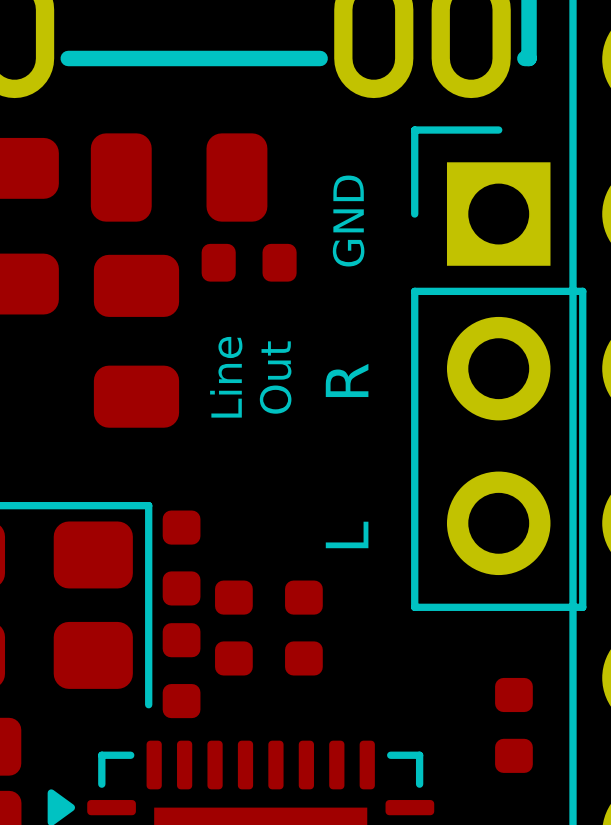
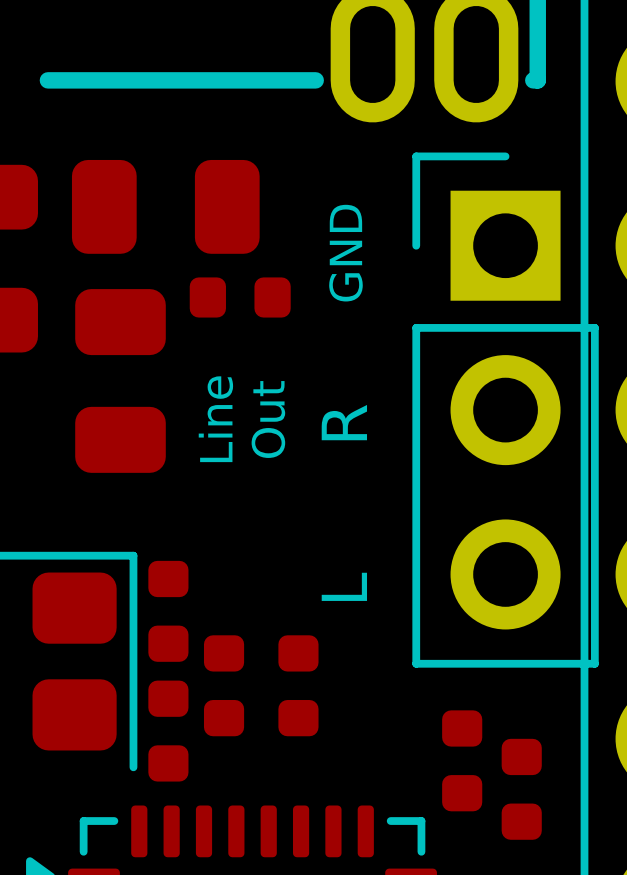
part: none -> (462, 760)

